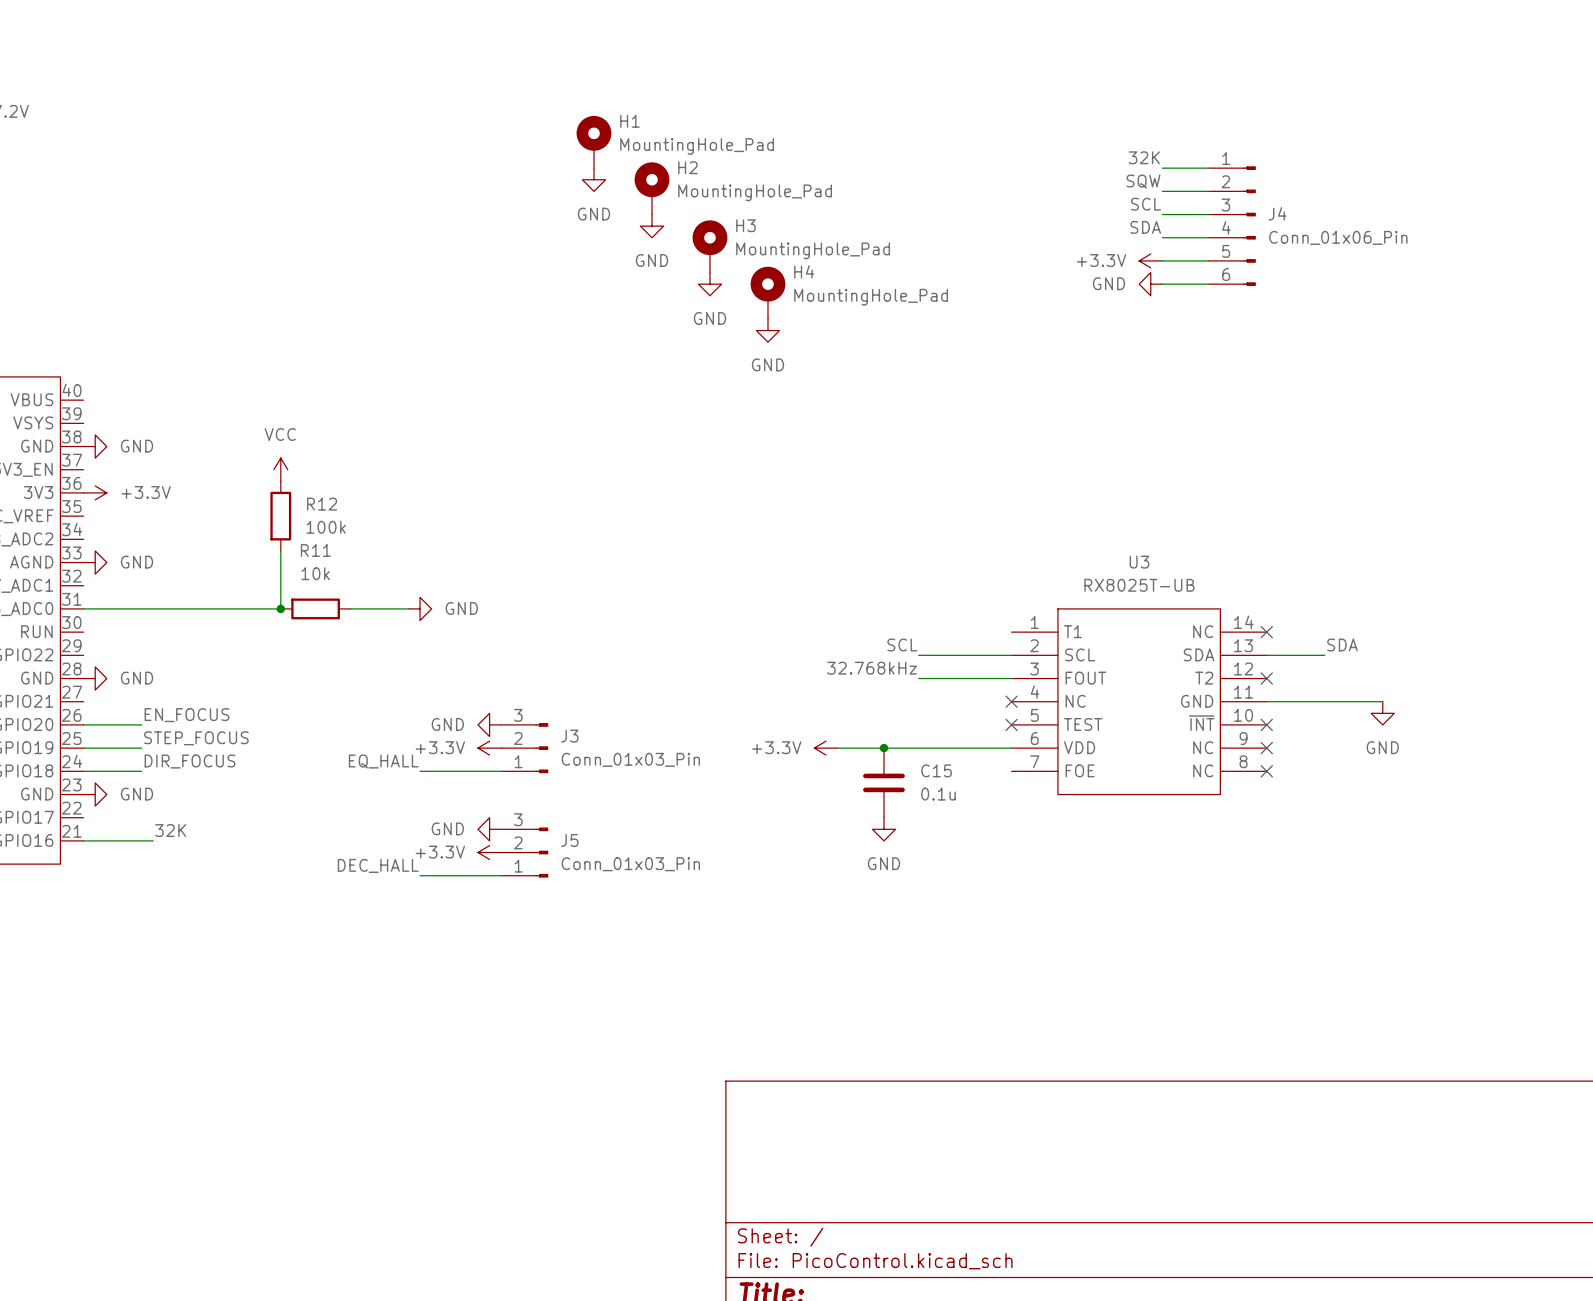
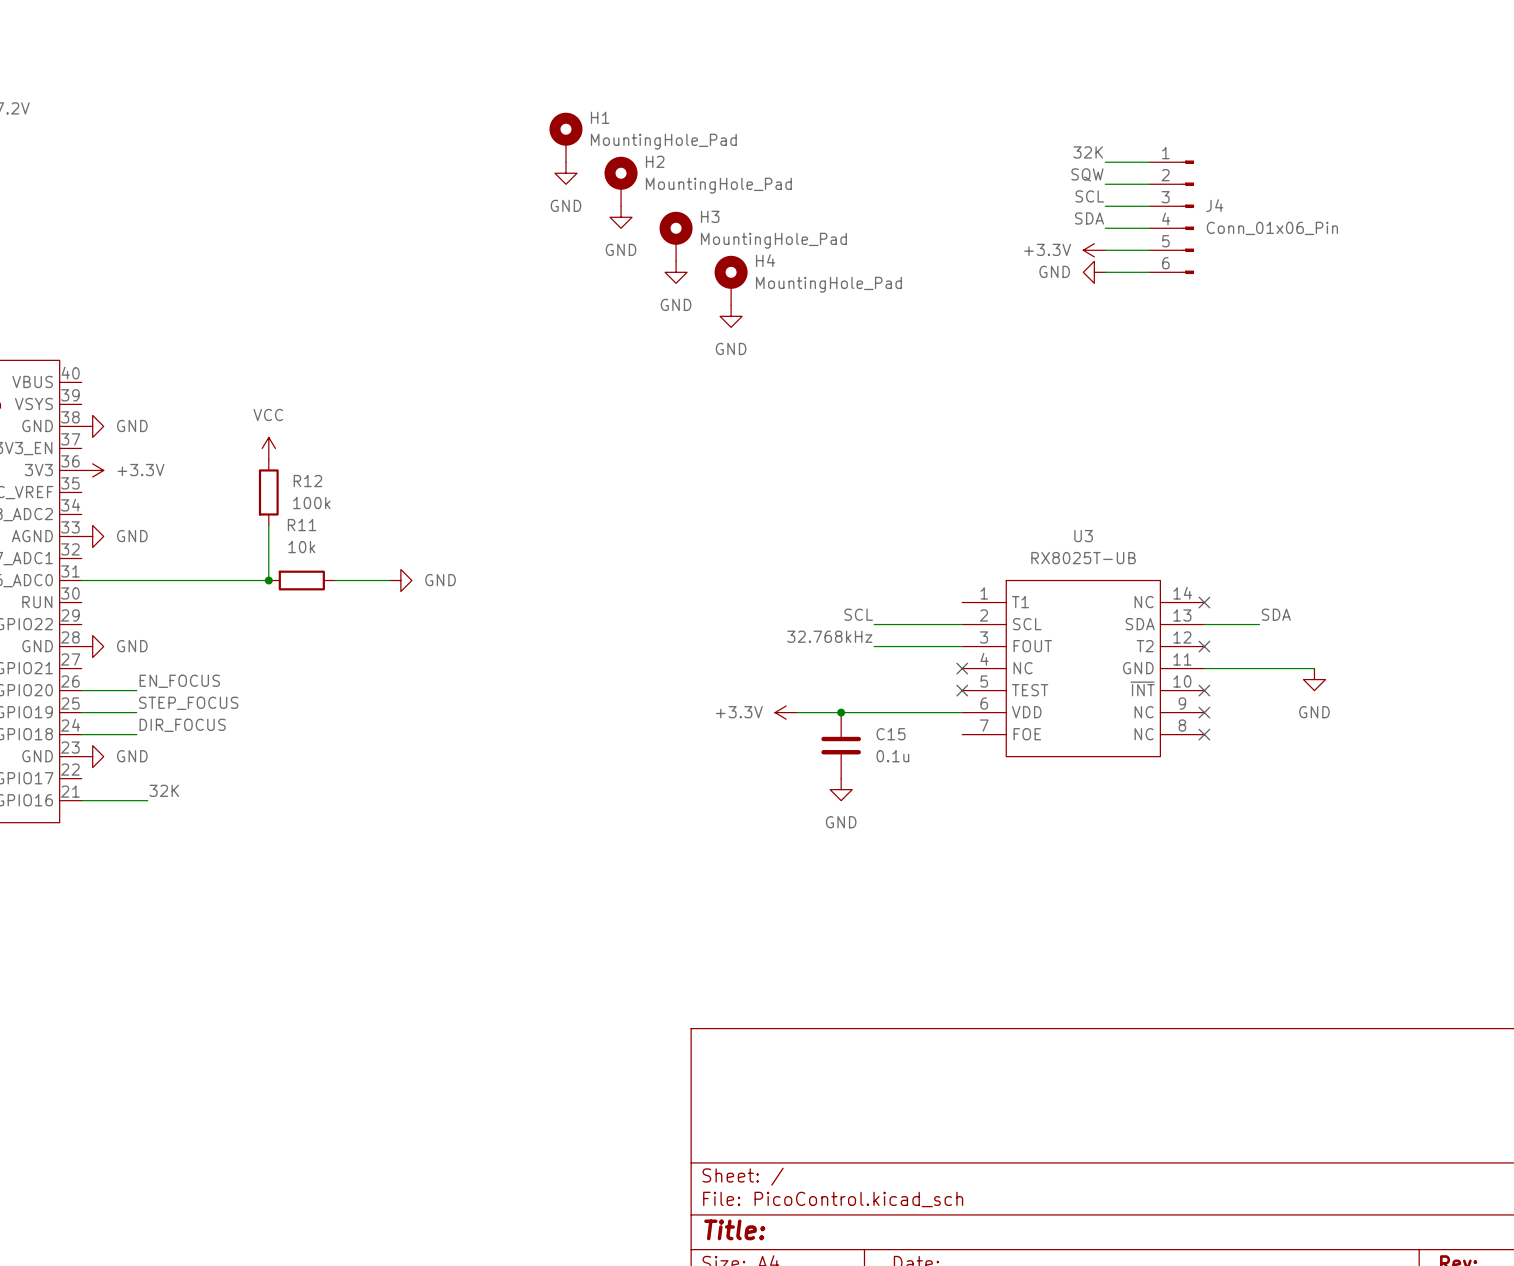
power symbol: GND (489, 724) -> none
power symbol: +3.3V (489, 748) -> none
J3: Conn_01x03_Pin (524, 748) -> none
label: EQ_HALL (383, 761) -> none
wire: (420, 771) (501, 771) -> none
power symbol: GND (489, 829) -> none
power symbol: +3.3V (489, 852) -> none
J5: Conn_01x03_Pin (524, 852) -> none
label: DEC_HALL (378, 865) -> none
wire: (420, 875) (501, 875) -> none

